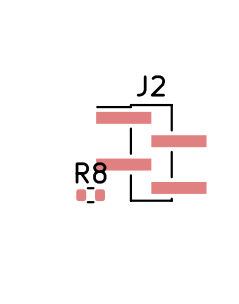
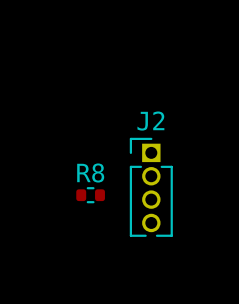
J2 footprint: [96, 103, 207, 202] -> [129, 137, 173, 237]

